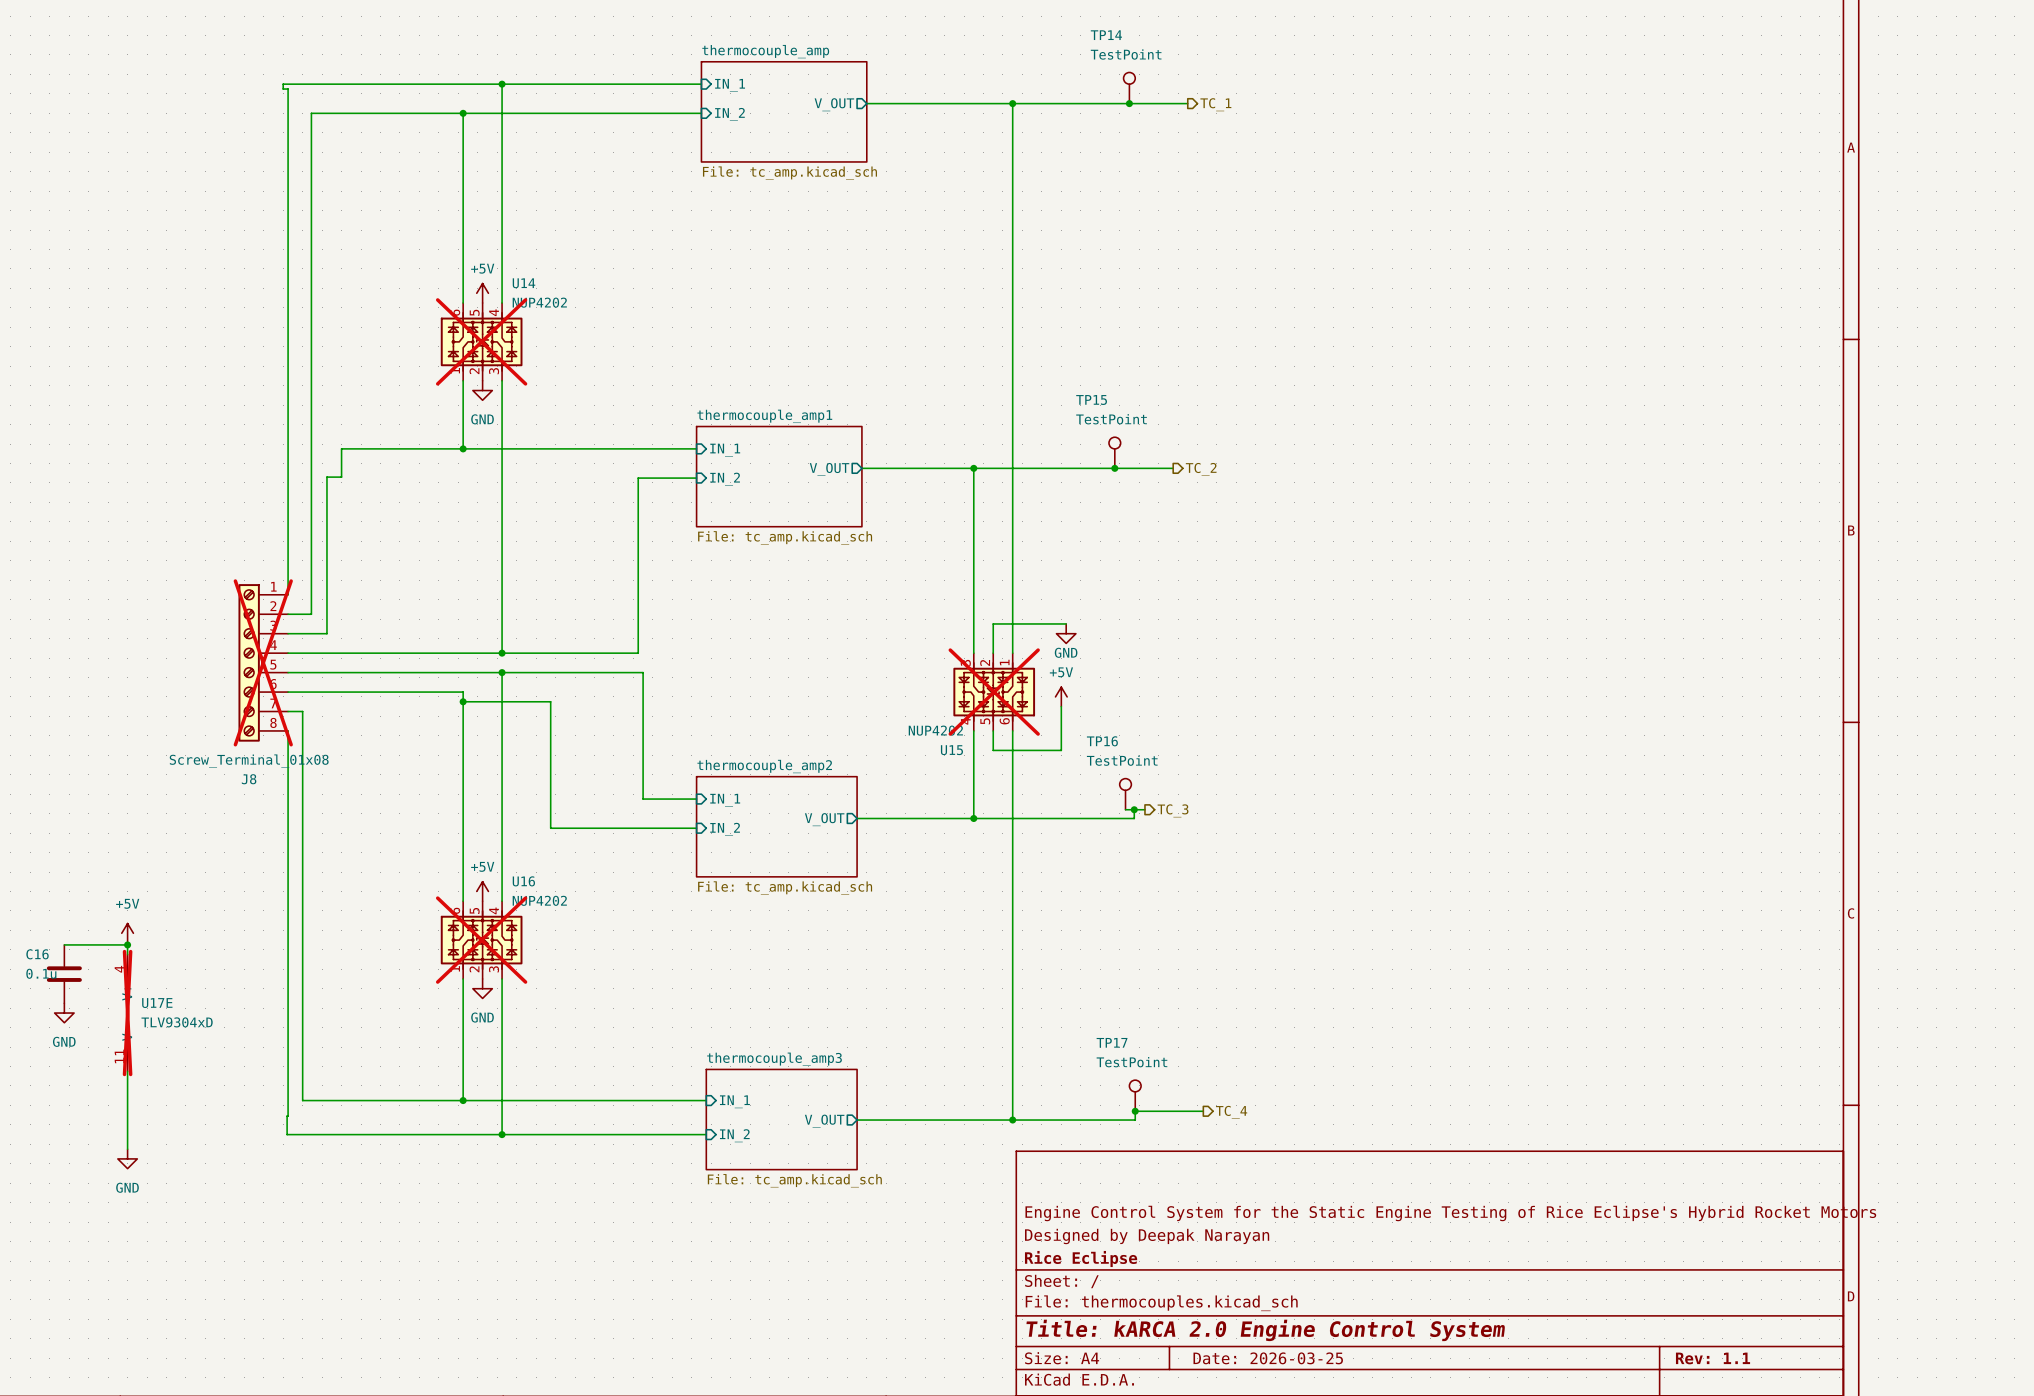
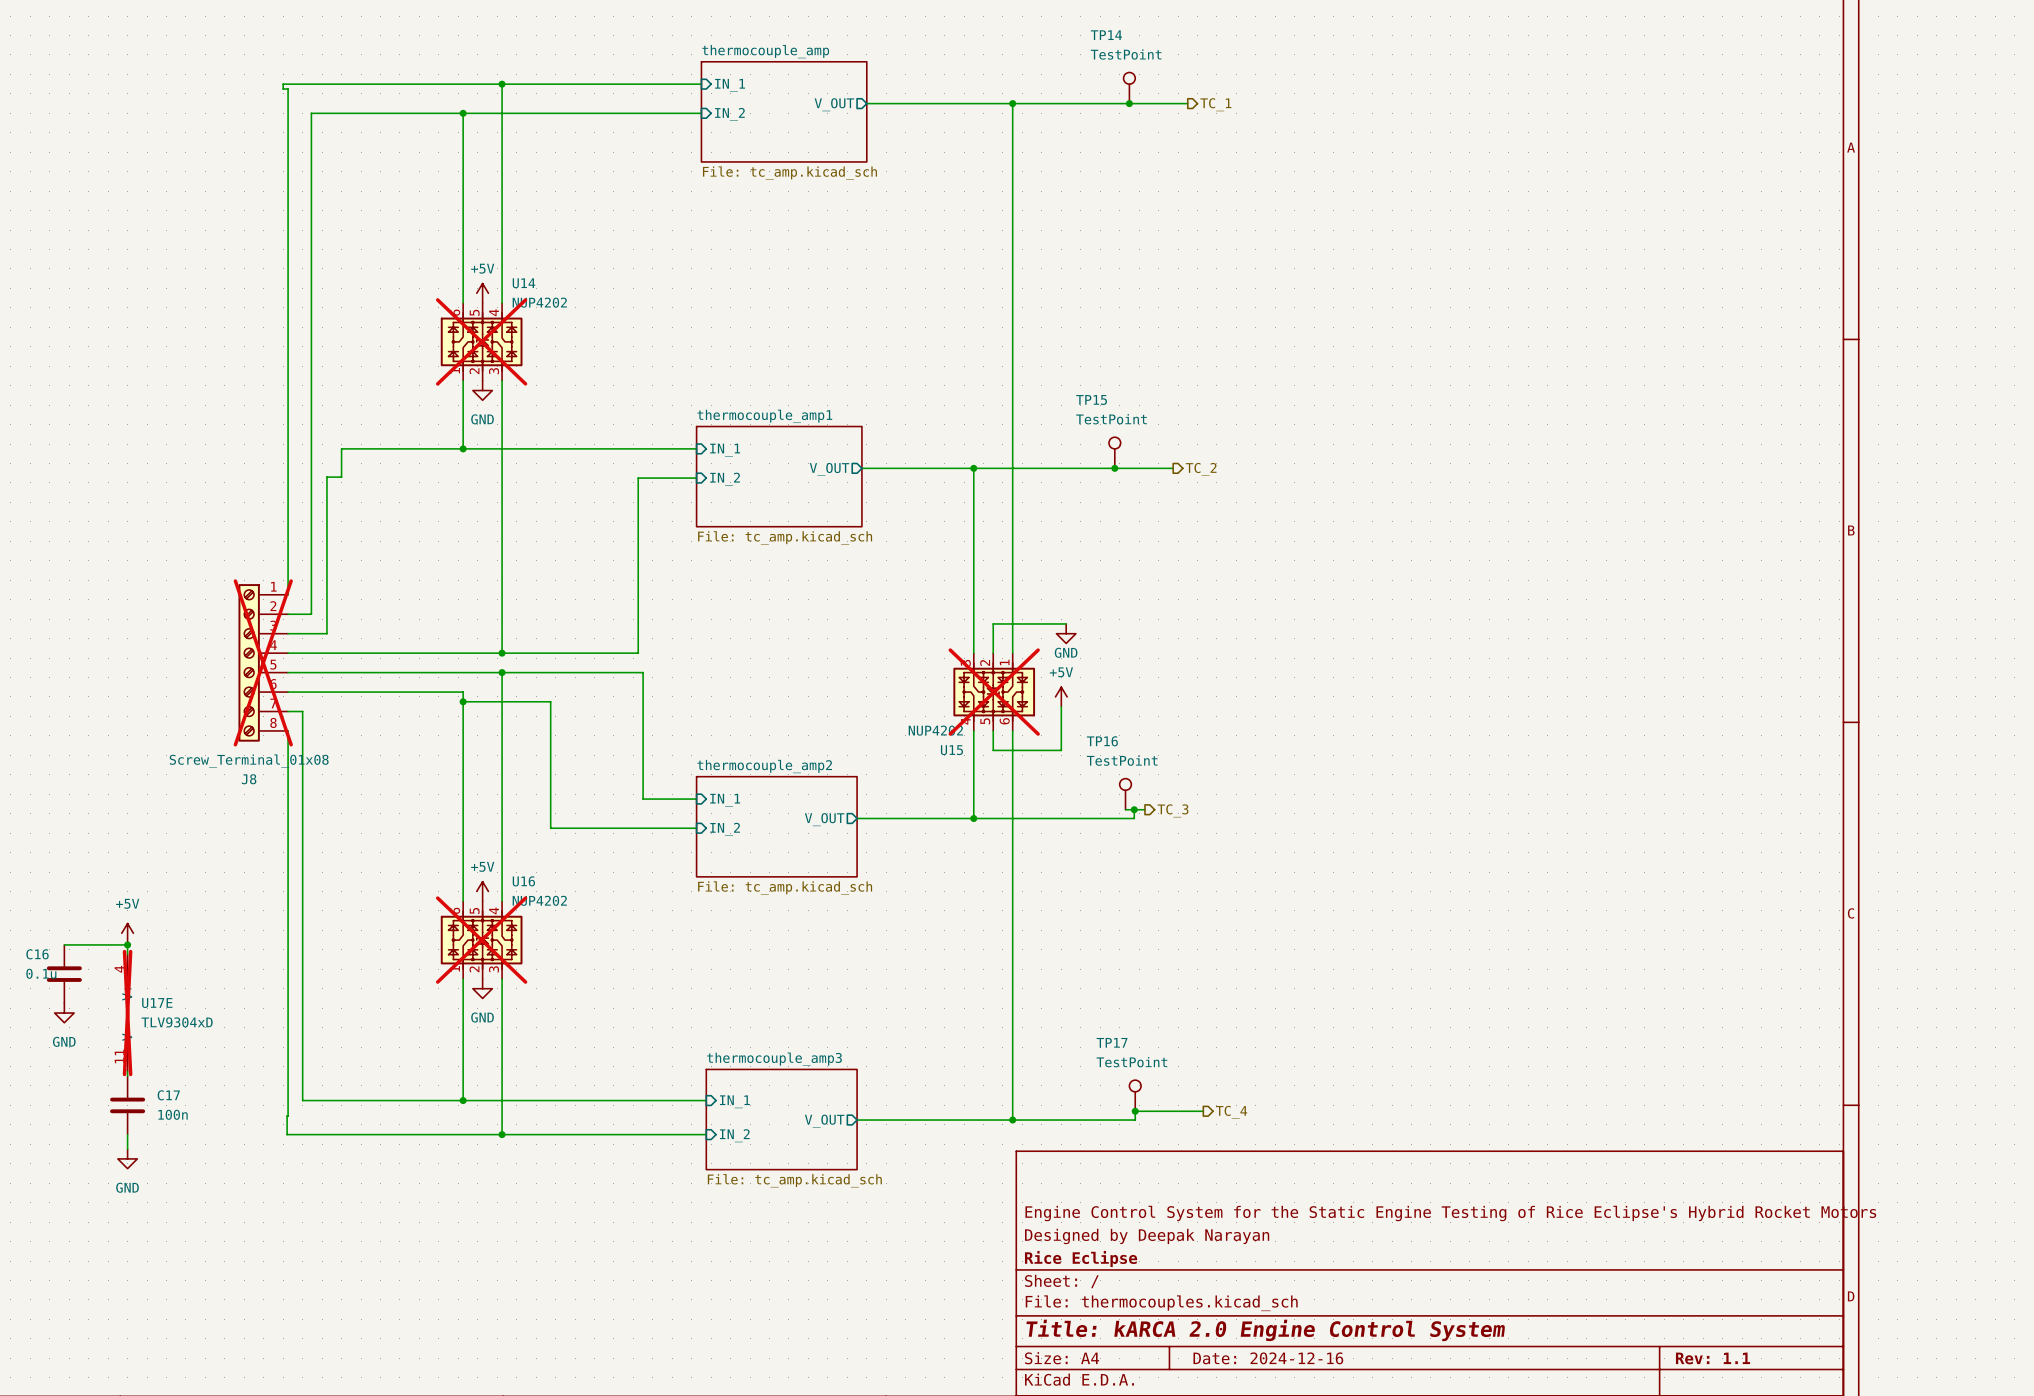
C17: none -> 100n (127, 1105)
title block: Date: 2026-03-25 (1268, 1358) -> Date: 2024-12-16 (1268, 1358)

